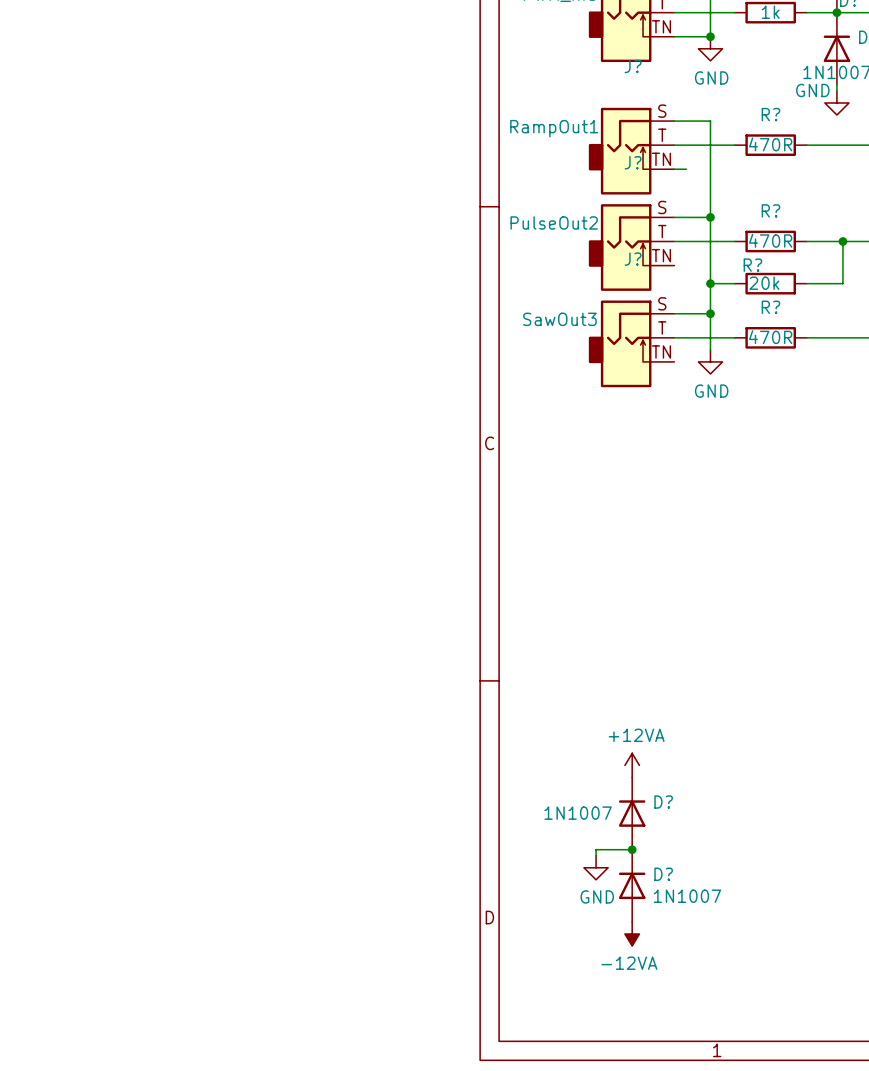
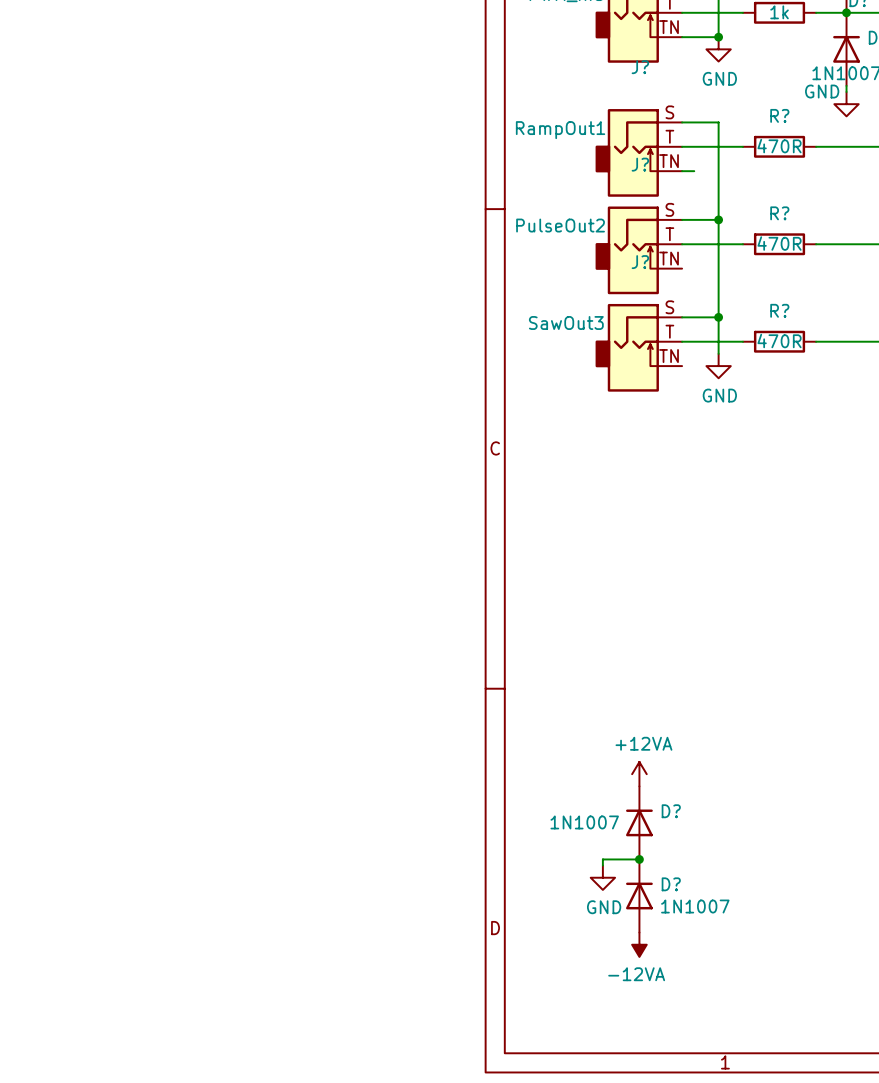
wire: (842, 241) (842, 283) (806, 283) -> none
junction: (842, 241) -> none
wire: (710, 283) (734, 283) -> none
junction: (710, 283) -> none
R?: 20k (770, 283) -> none

